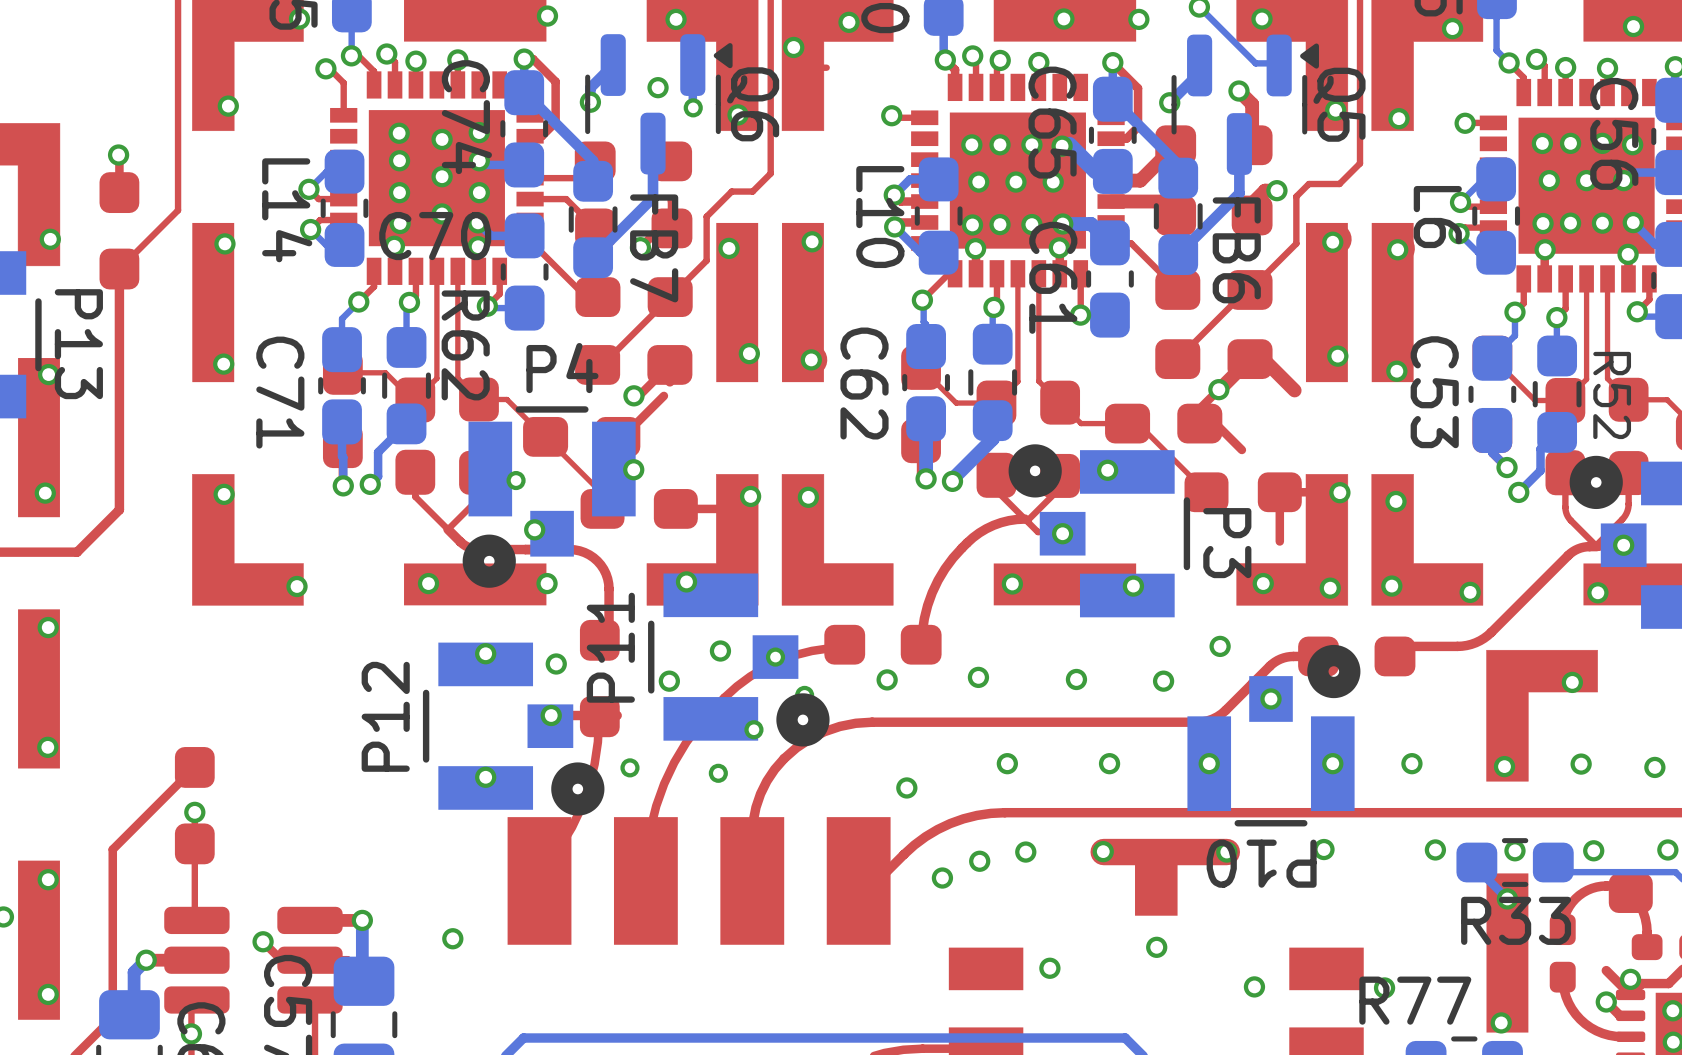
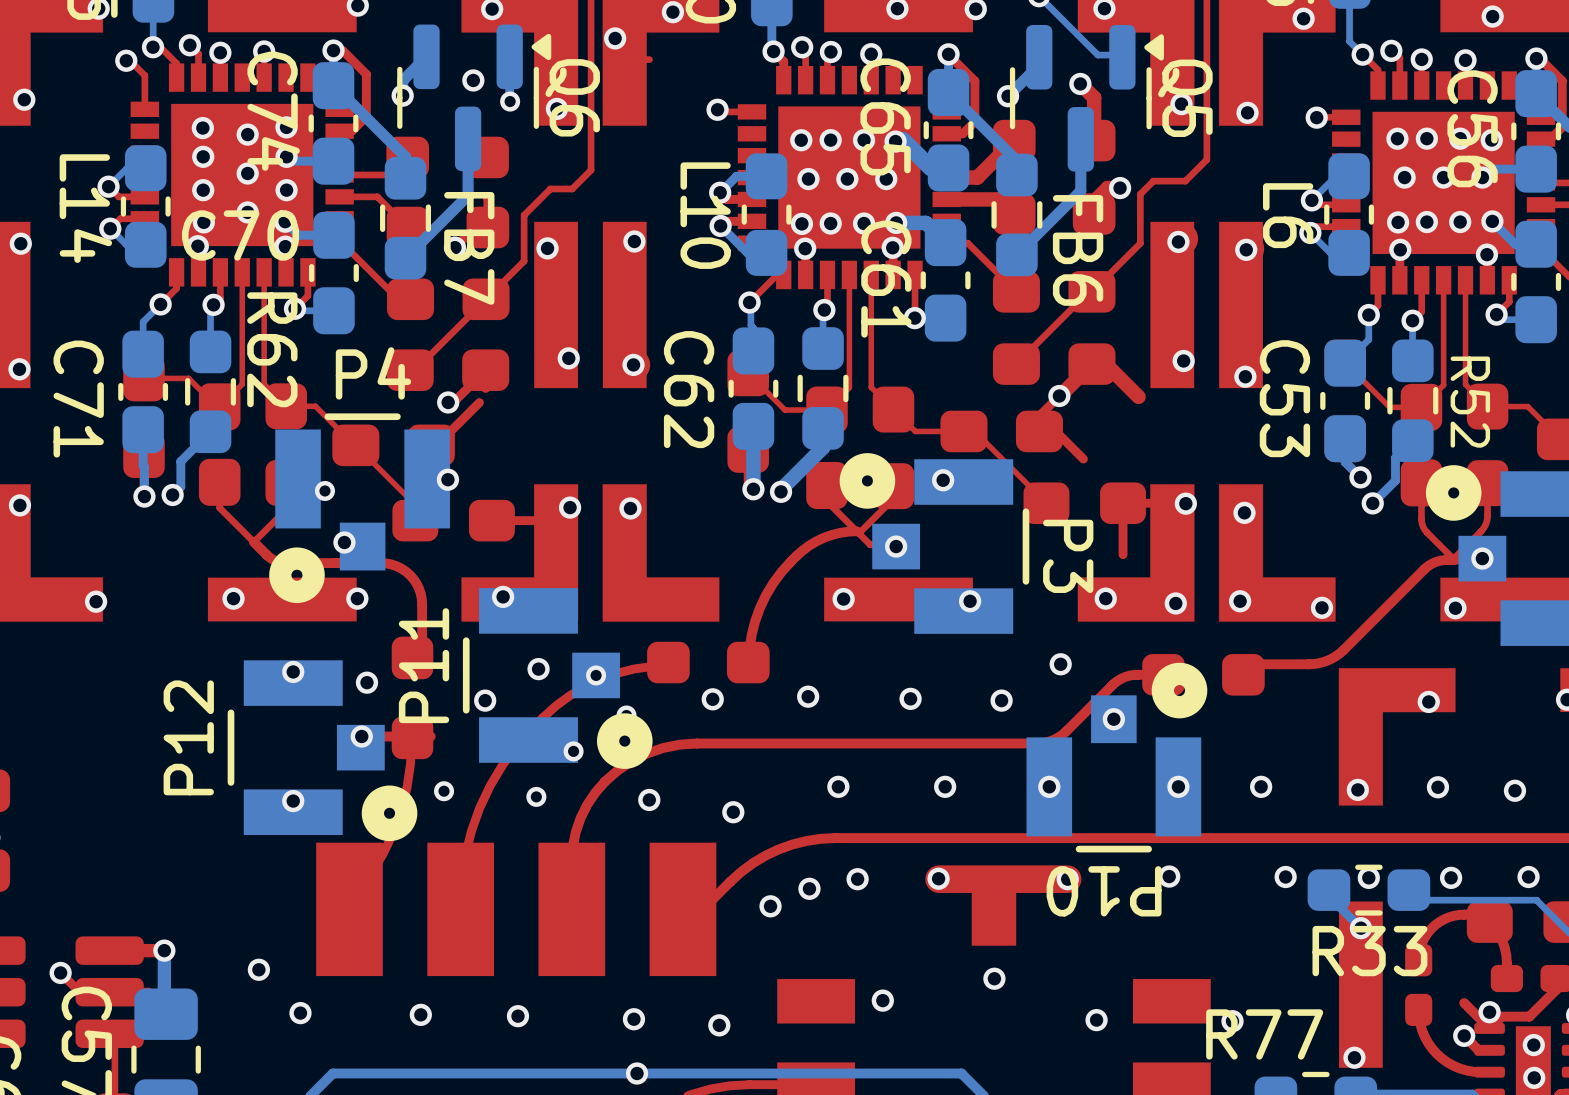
via: none -> (649, 799)
via: none -> (300, 1013)
via: none -> (420, 1014)
via: none -> (517, 1016)
via: none -> (633, 1019)
via: none -> (719, 1025)
via: none -> (637, 1073)

